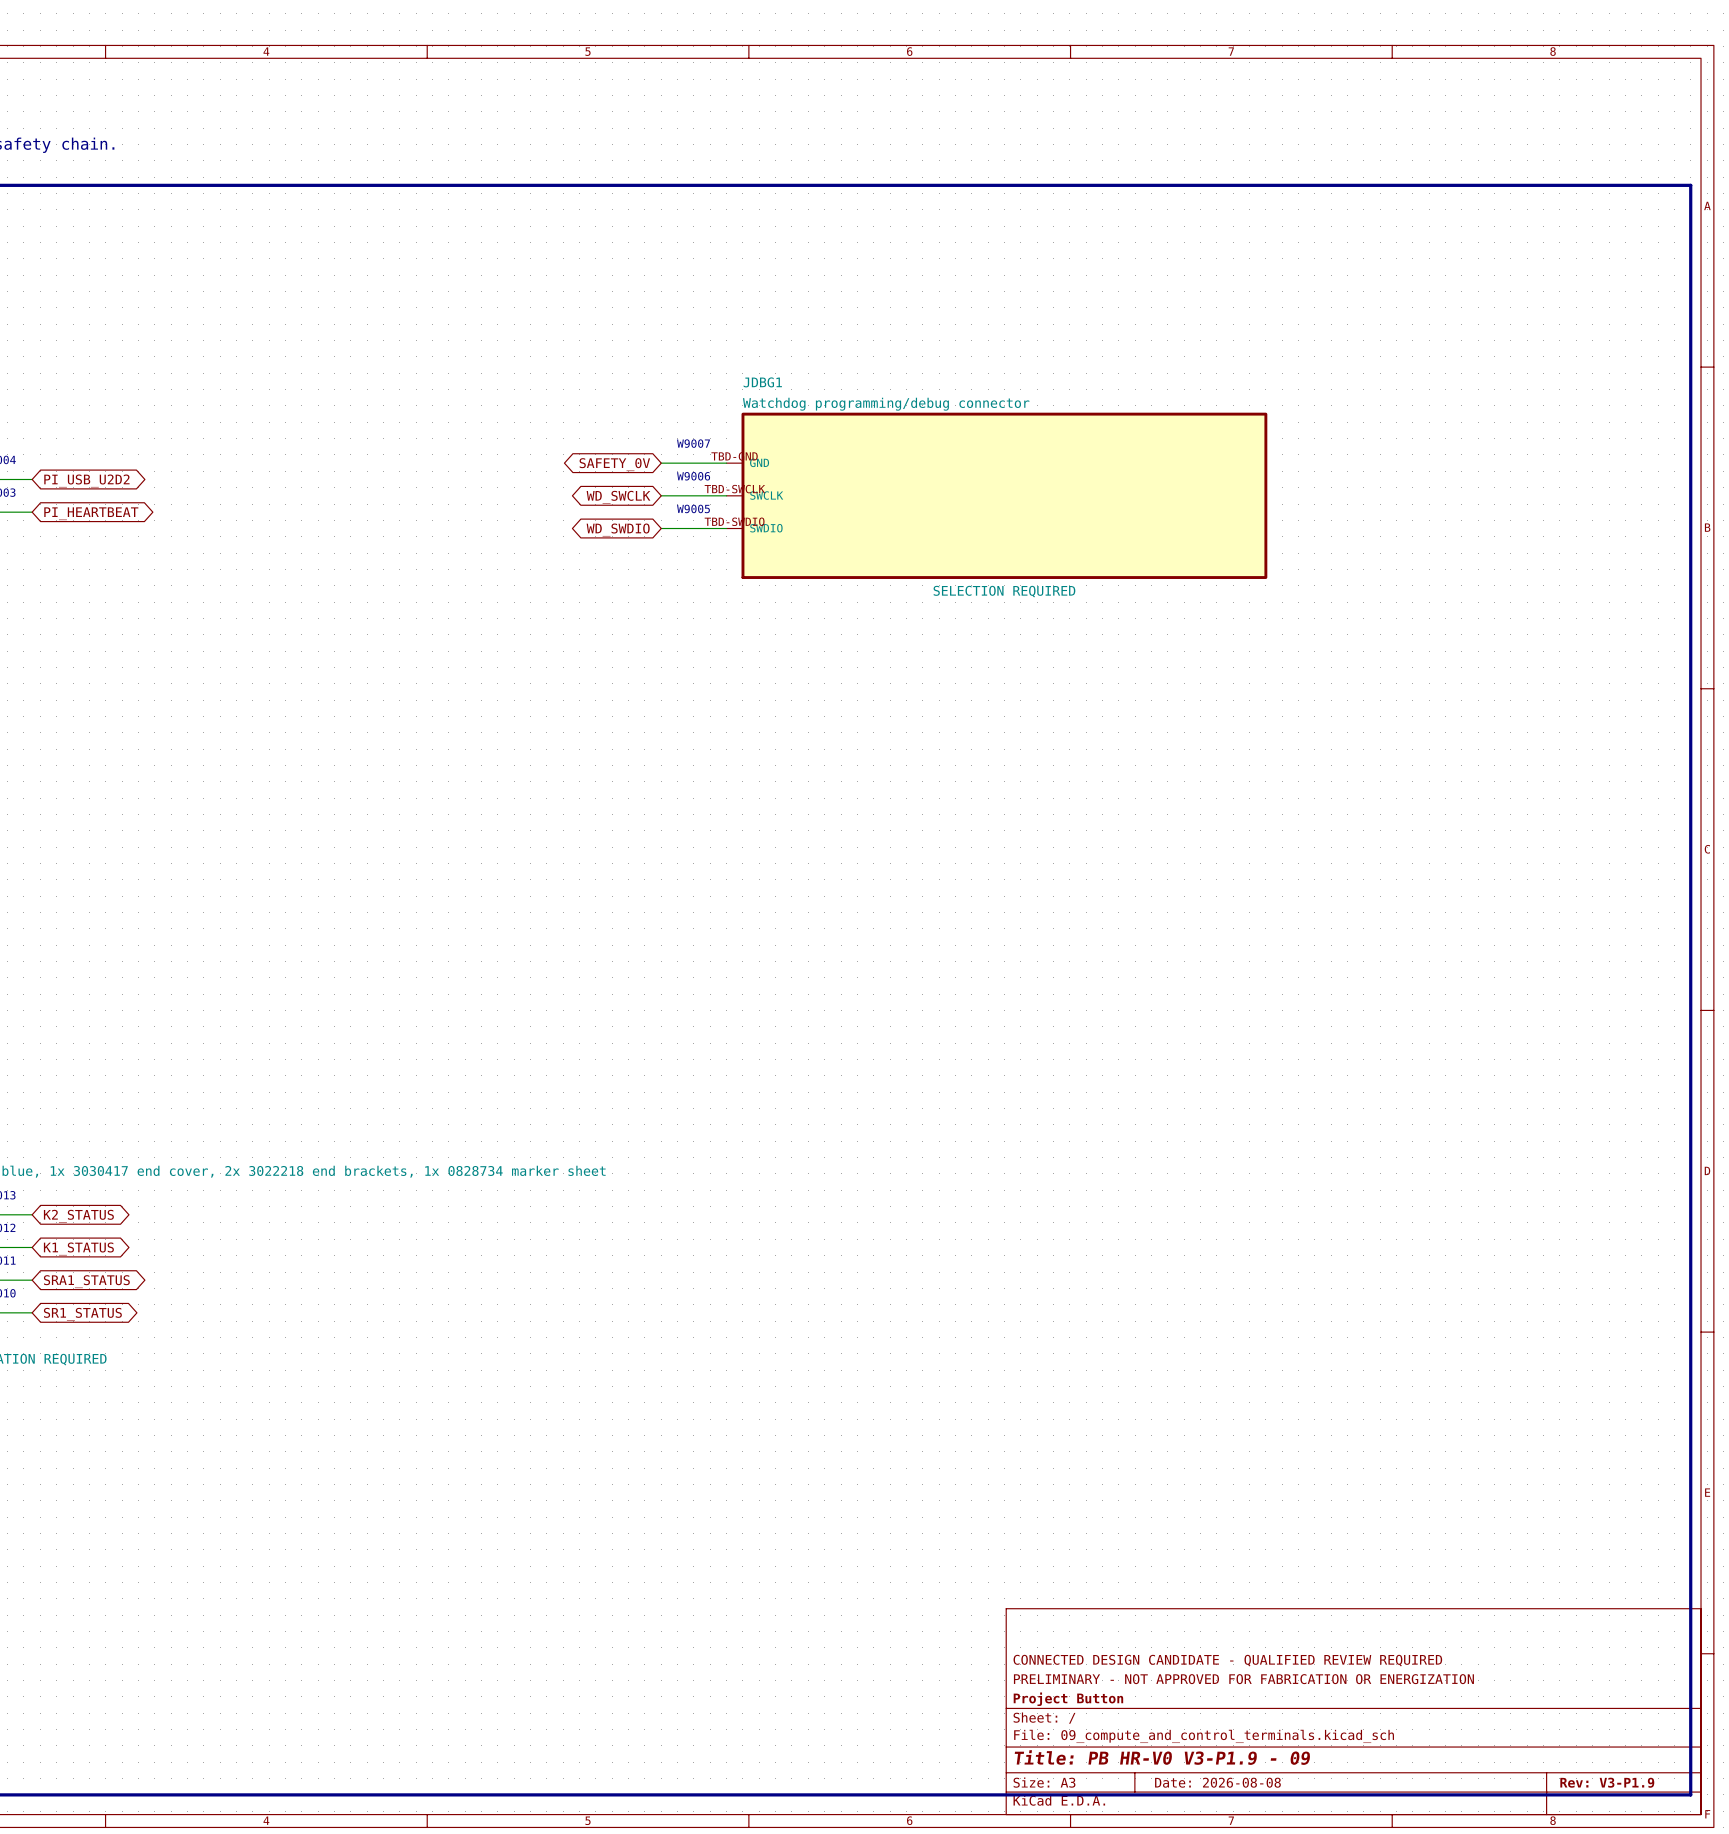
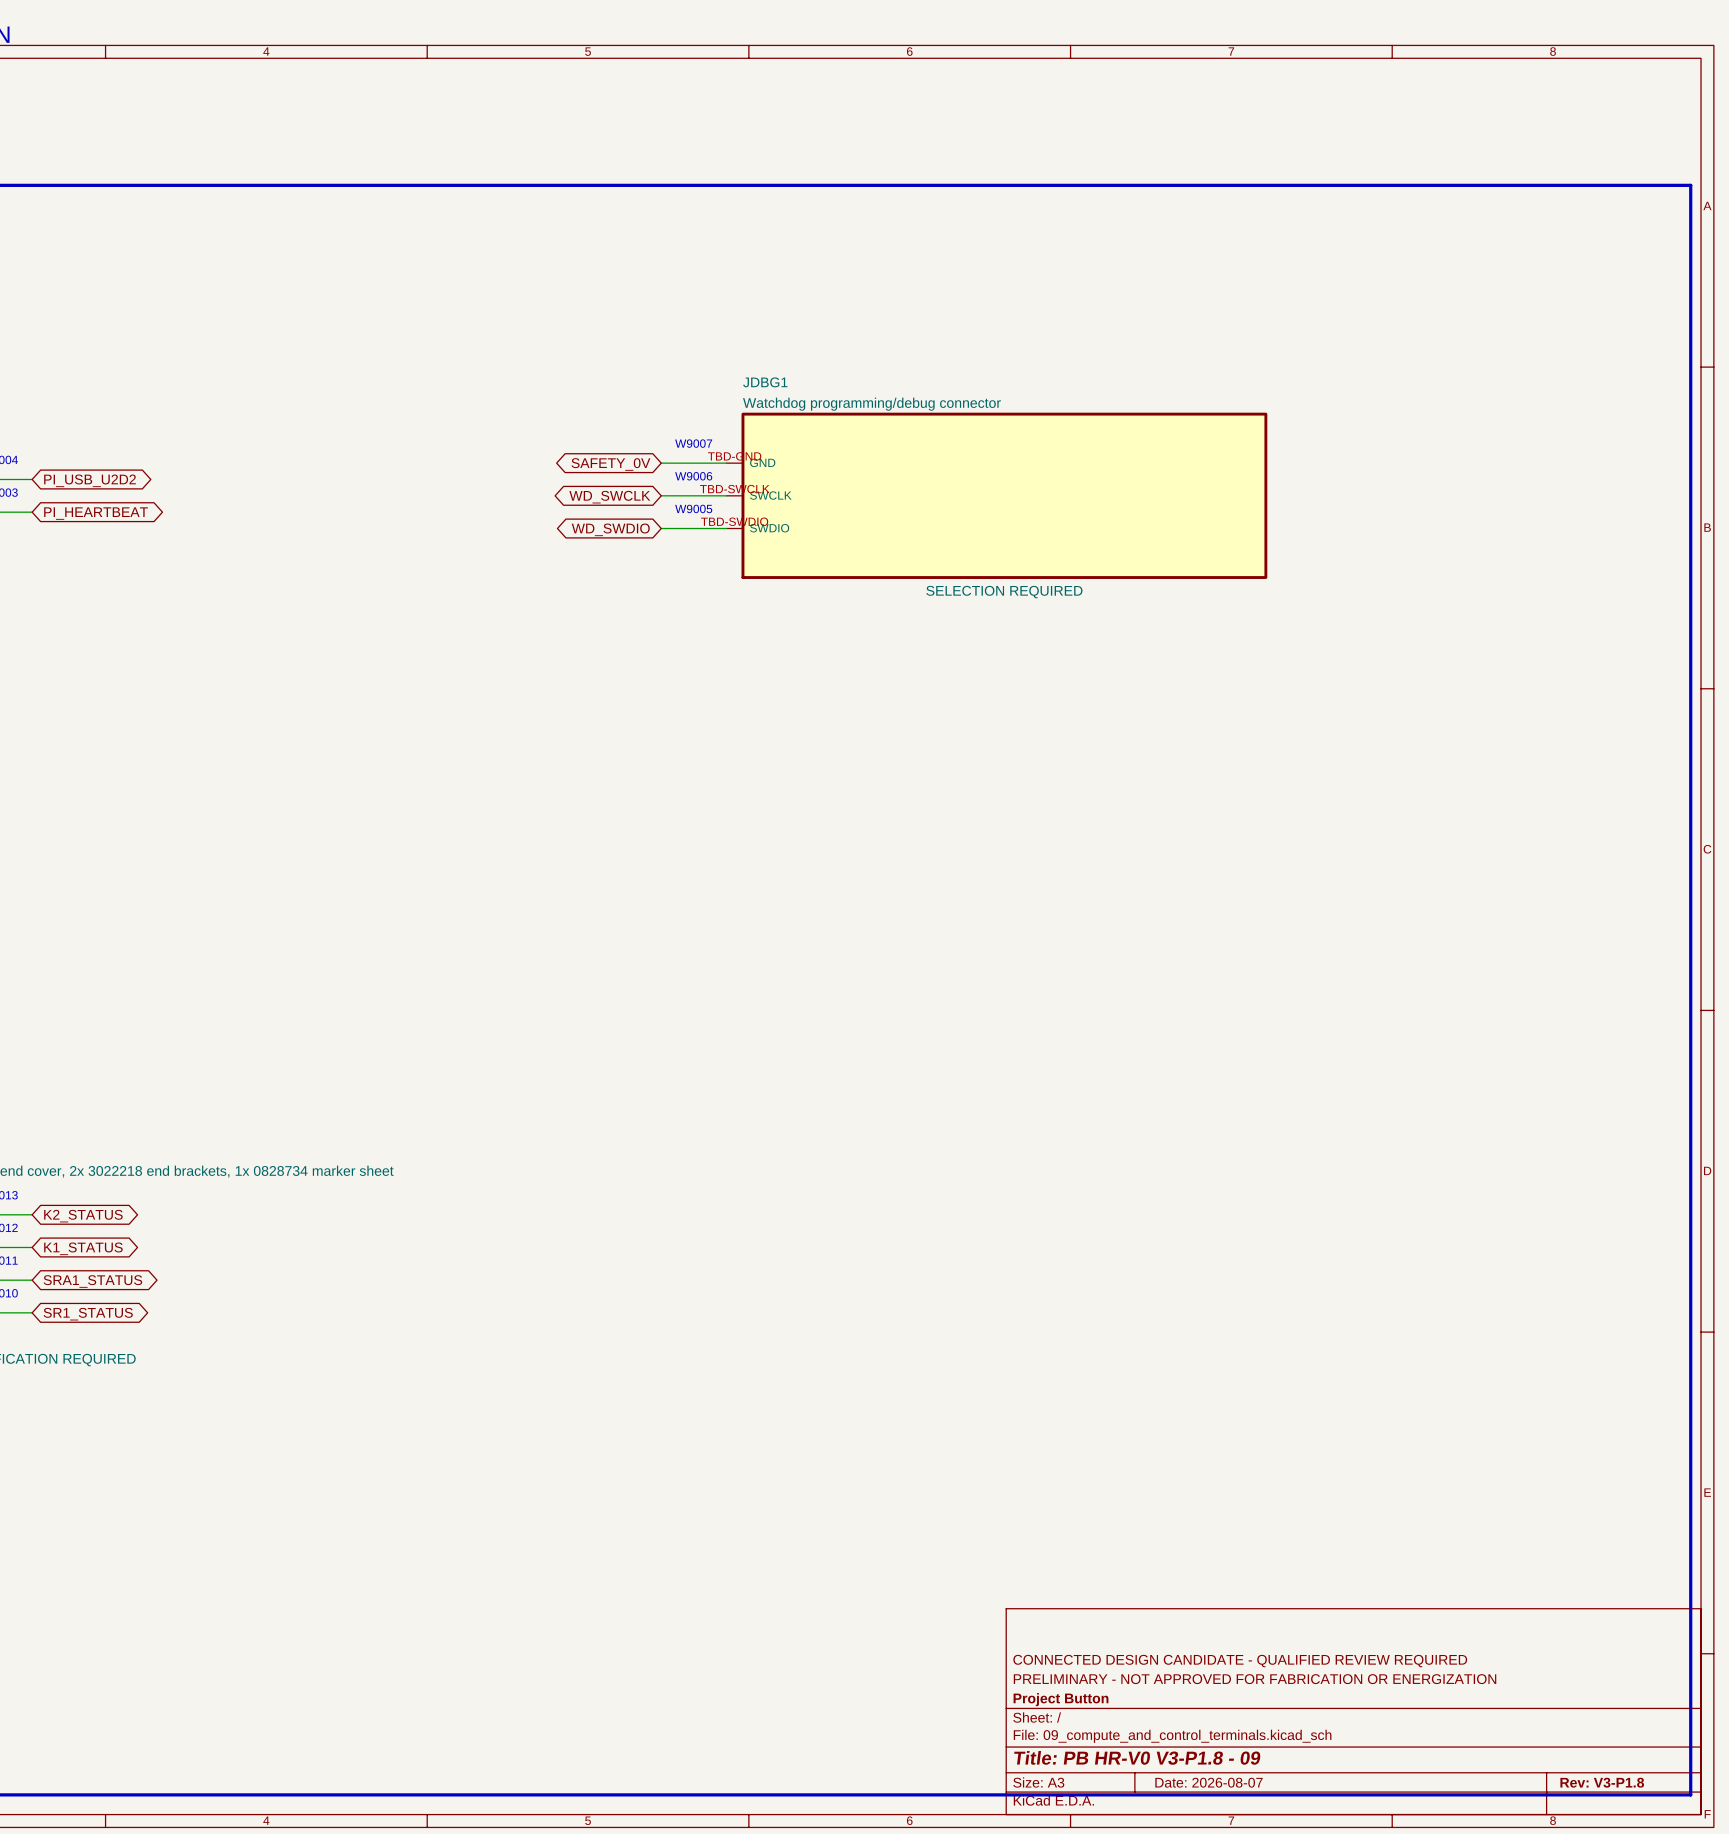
title block: Title: PB HR-V0 V3-P1.9 - 09 (1162, 1757) -> Title: PB HR-V0 V3-P1.8 - 09 (1137, 1757)
title block: Date: 2026-08-08 (1217, 1782) -> Date: 2026-08-07 (1208, 1782)
title block: Rev: V3-P1.9 (1607, 1782) -> Rev: V3-P1.8 (1602, 1782)

